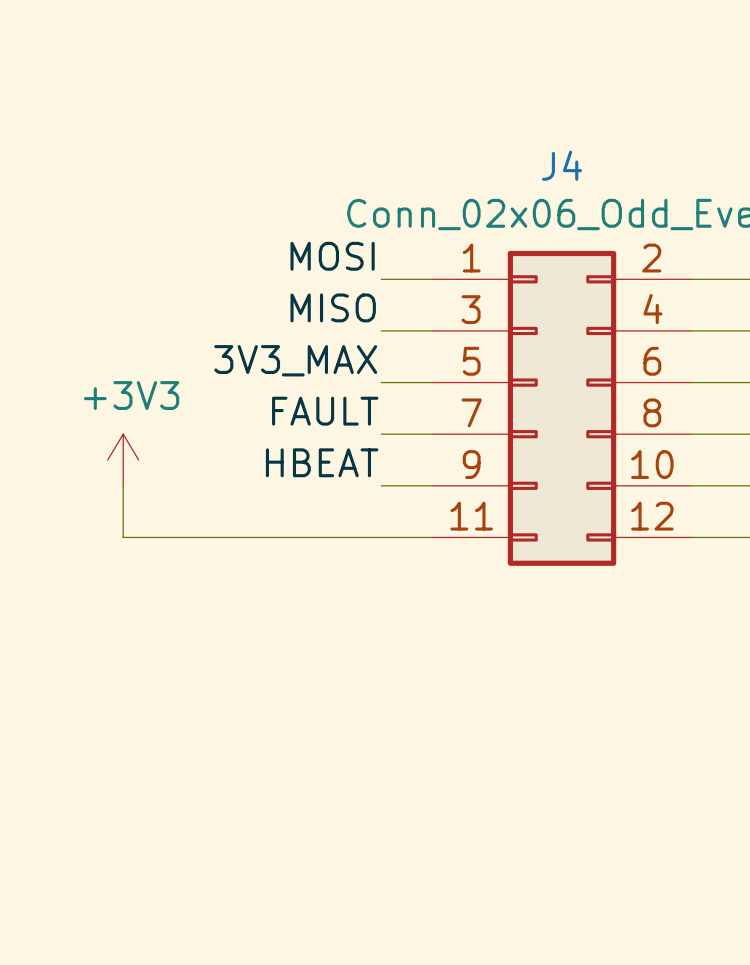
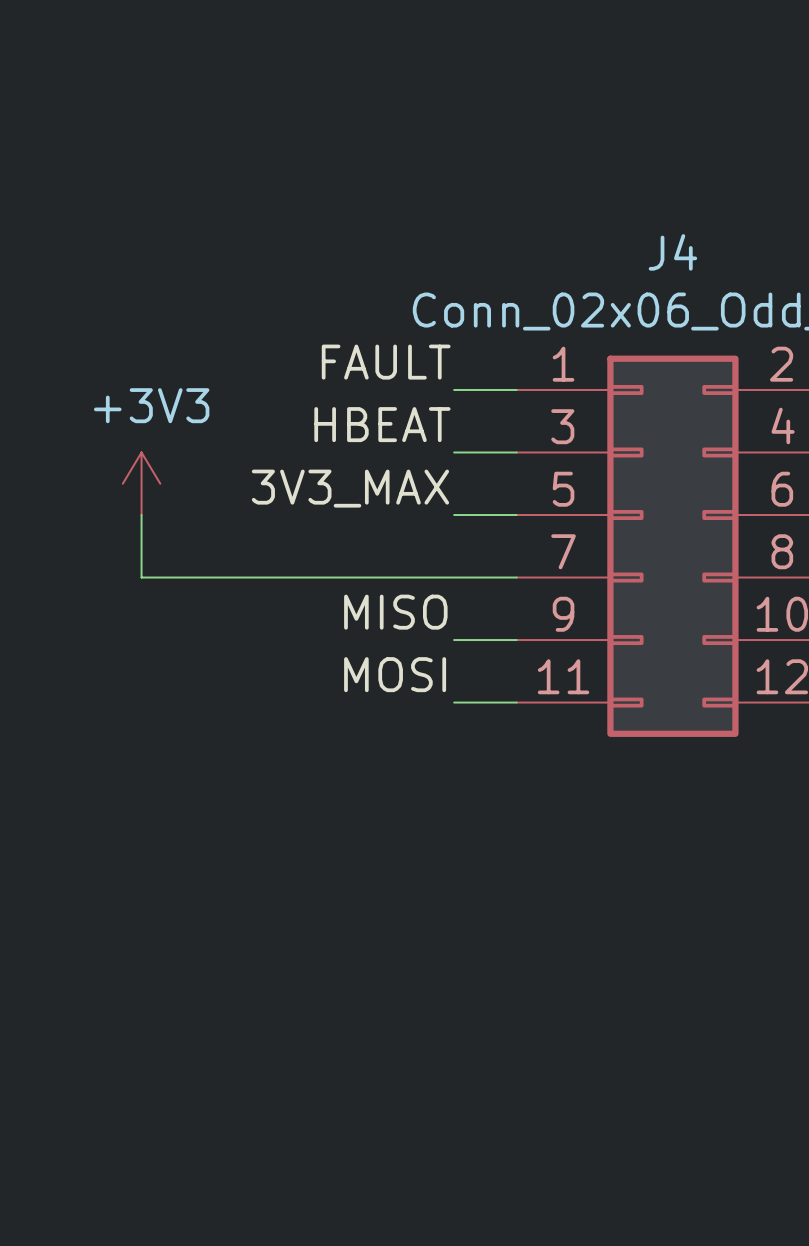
label: MOSI (332, 256) -> FAULT (386, 362)
label: MISO (333, 307) -> HBEAT (382, 424)
label: FAULT (325, 411) -> none
power symbol position: +3V3 (123, 460) -> +3V3 (141, 483)
label: HBEAT (322, 462) -> MISO (395, 612)
wire: (123, 485) (123, 537) (381, 537) -> (141, 515) (141, 577) (454, 577)
label: none -> MOSI (395, 674)

